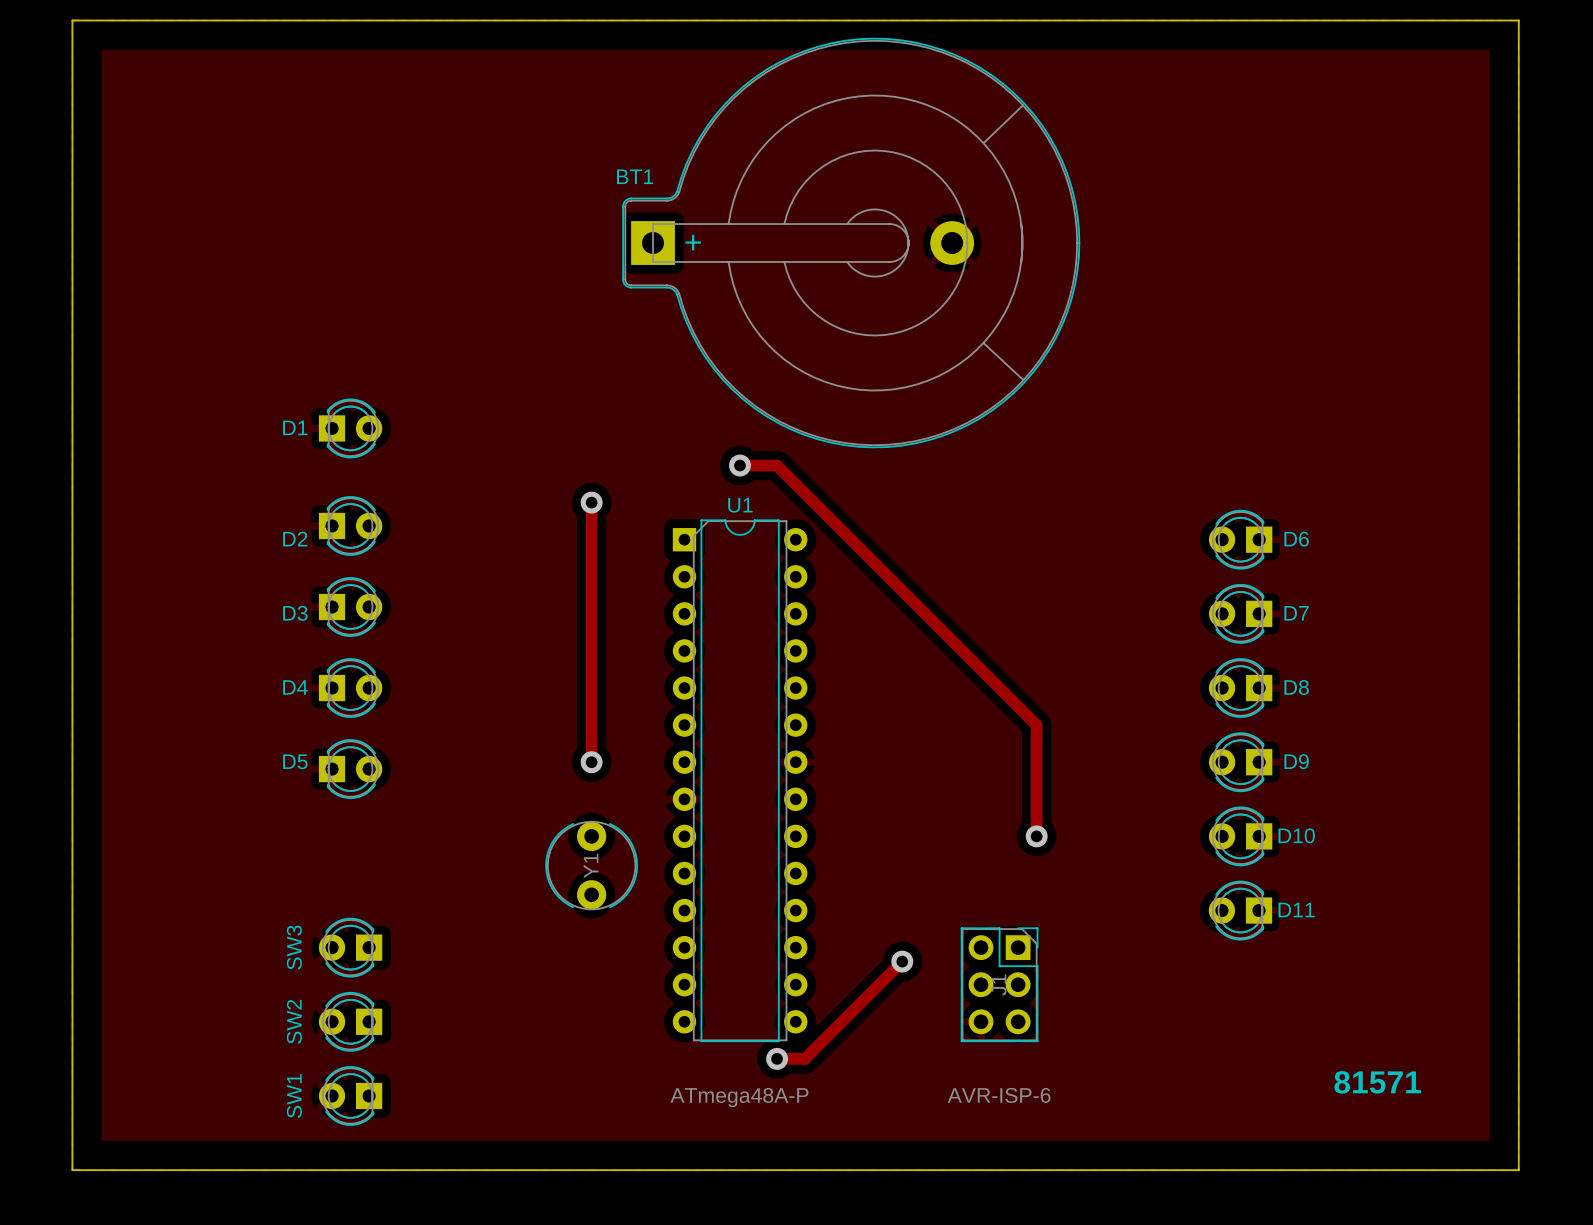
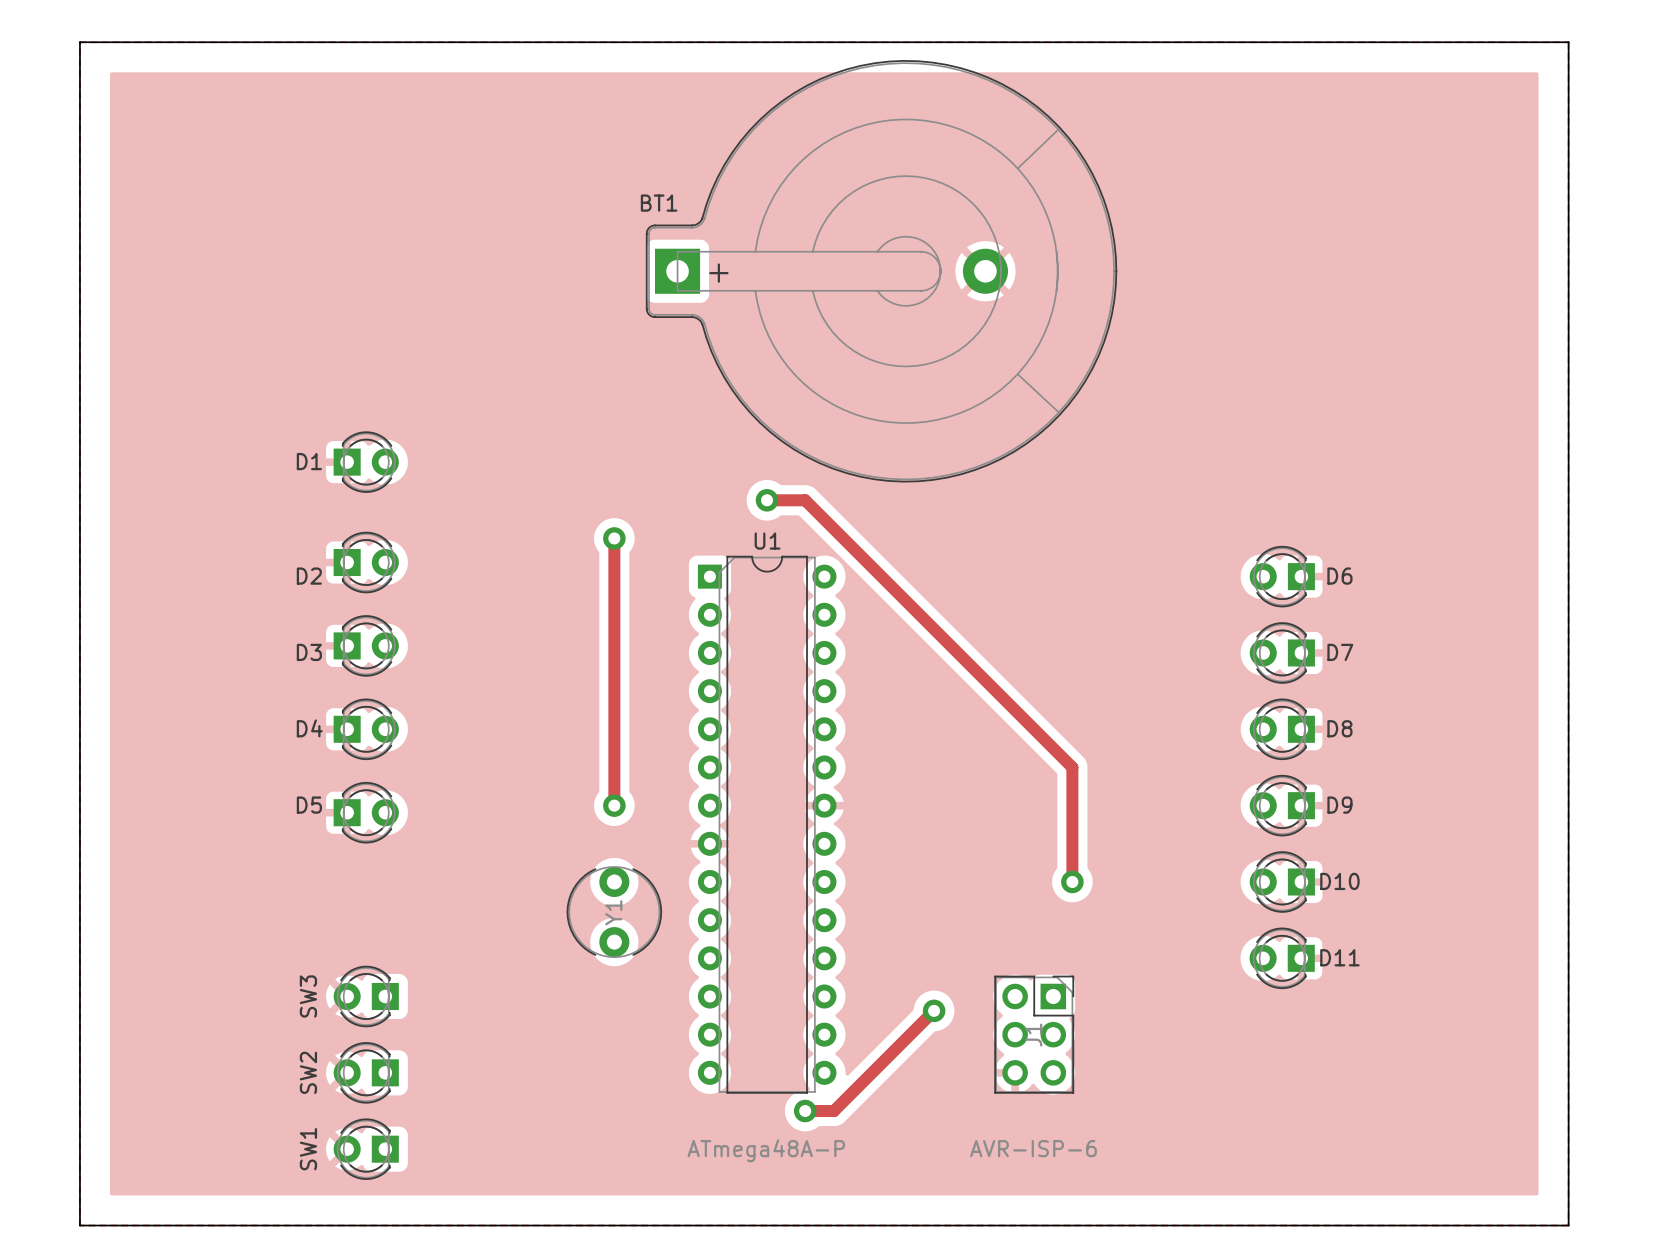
text: 81571 (1377, 1082) -> none

